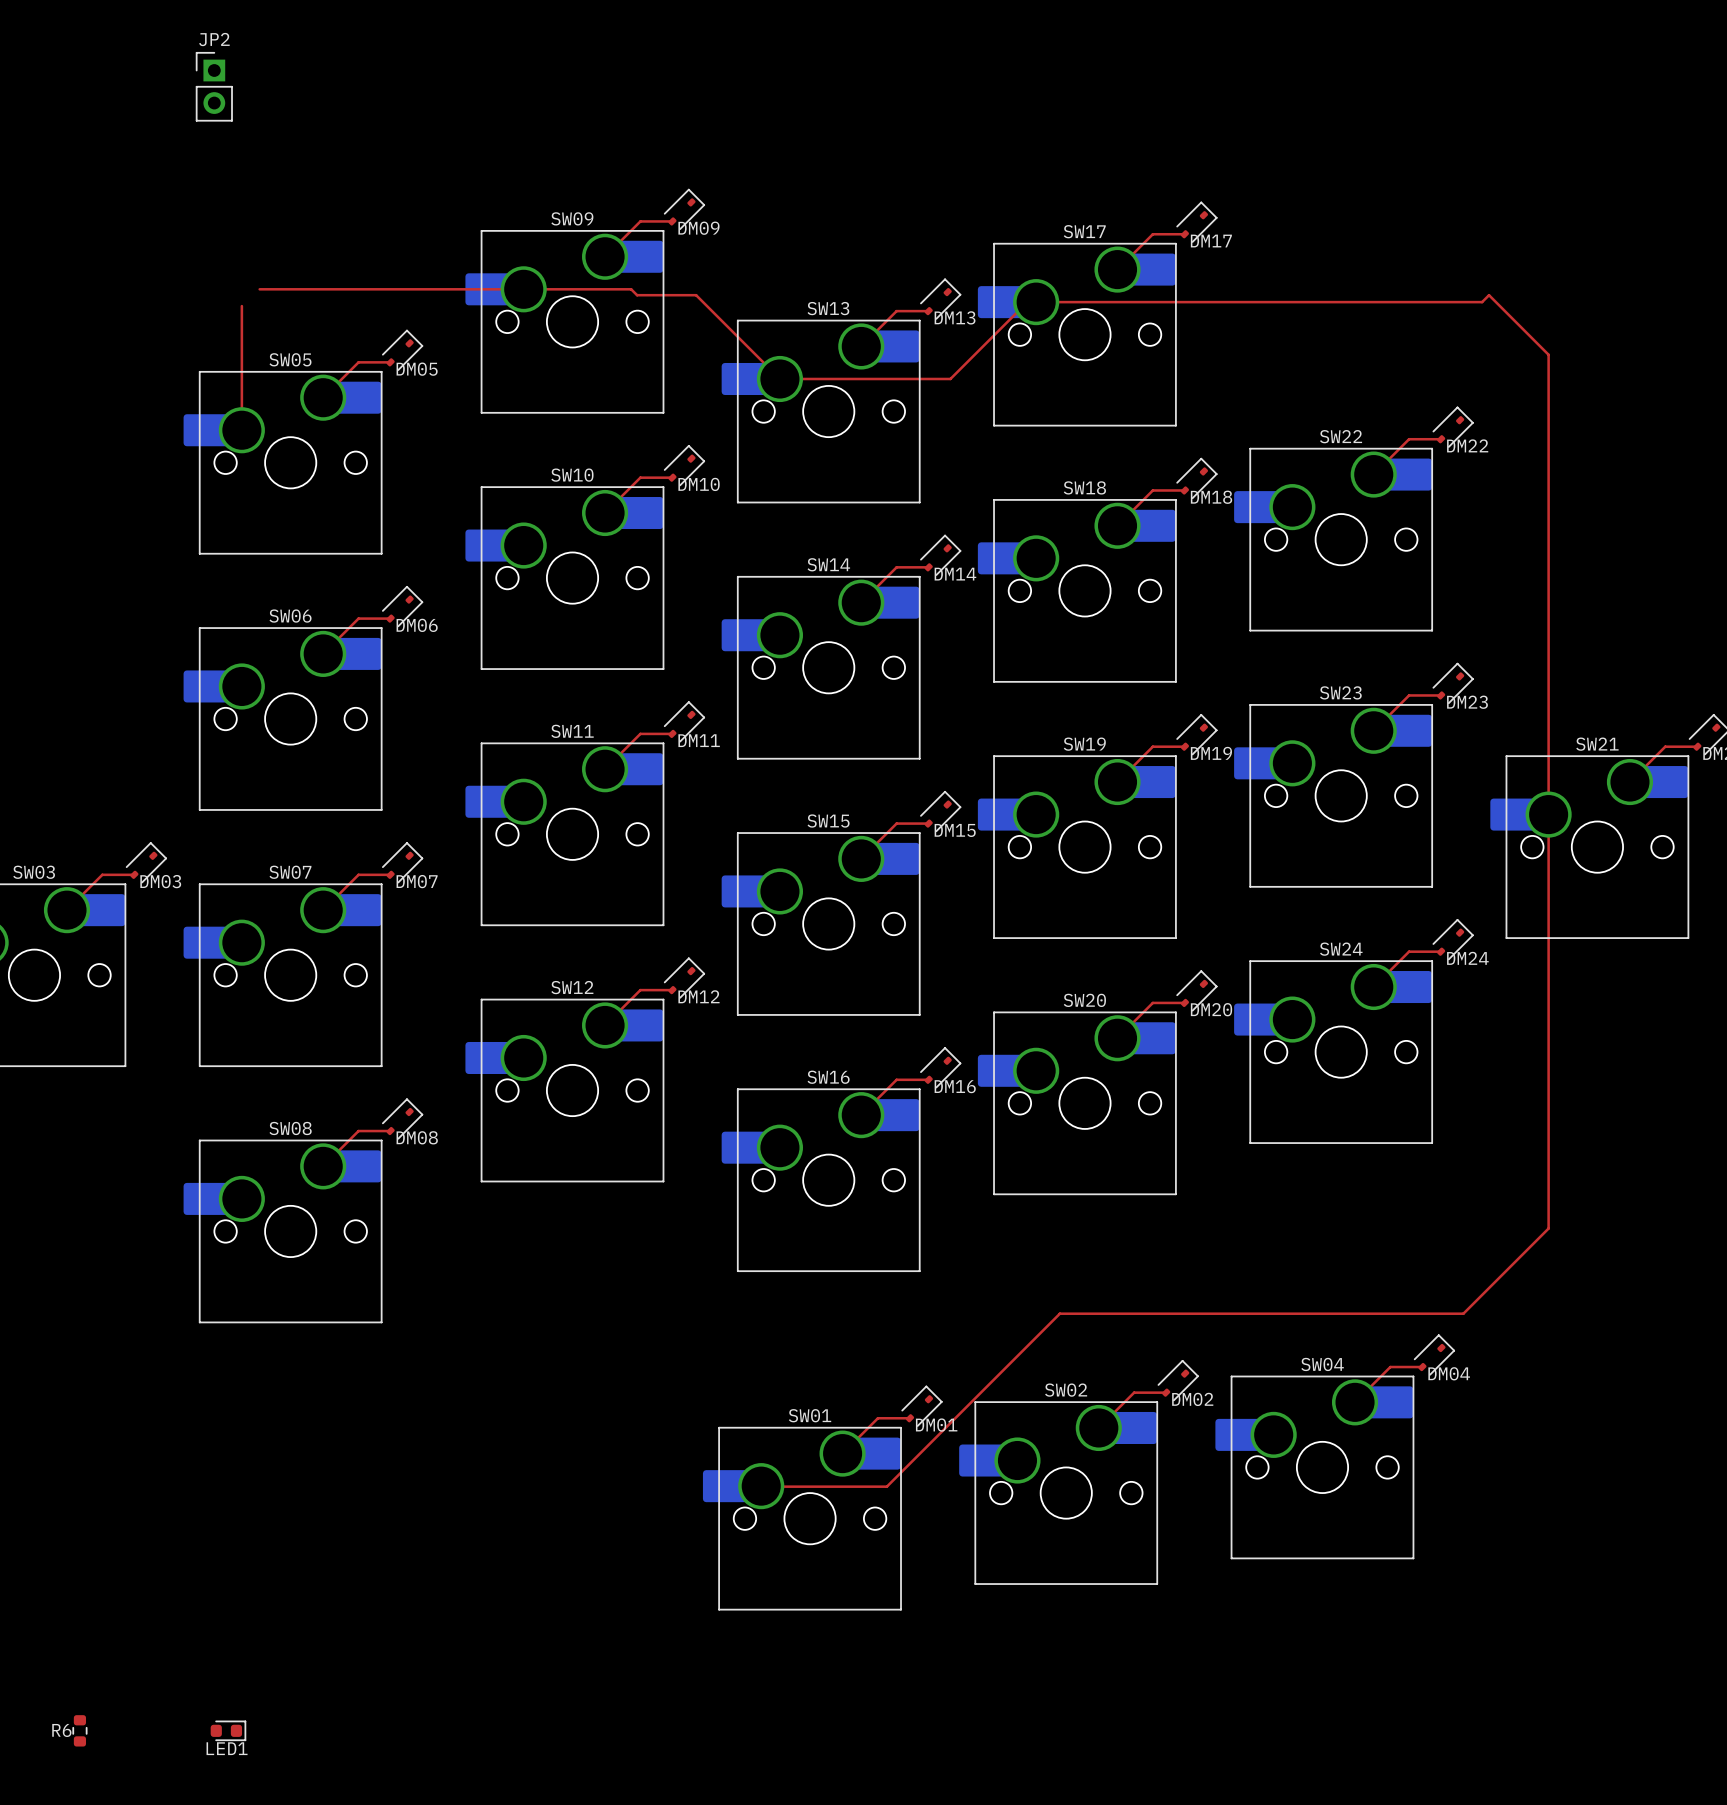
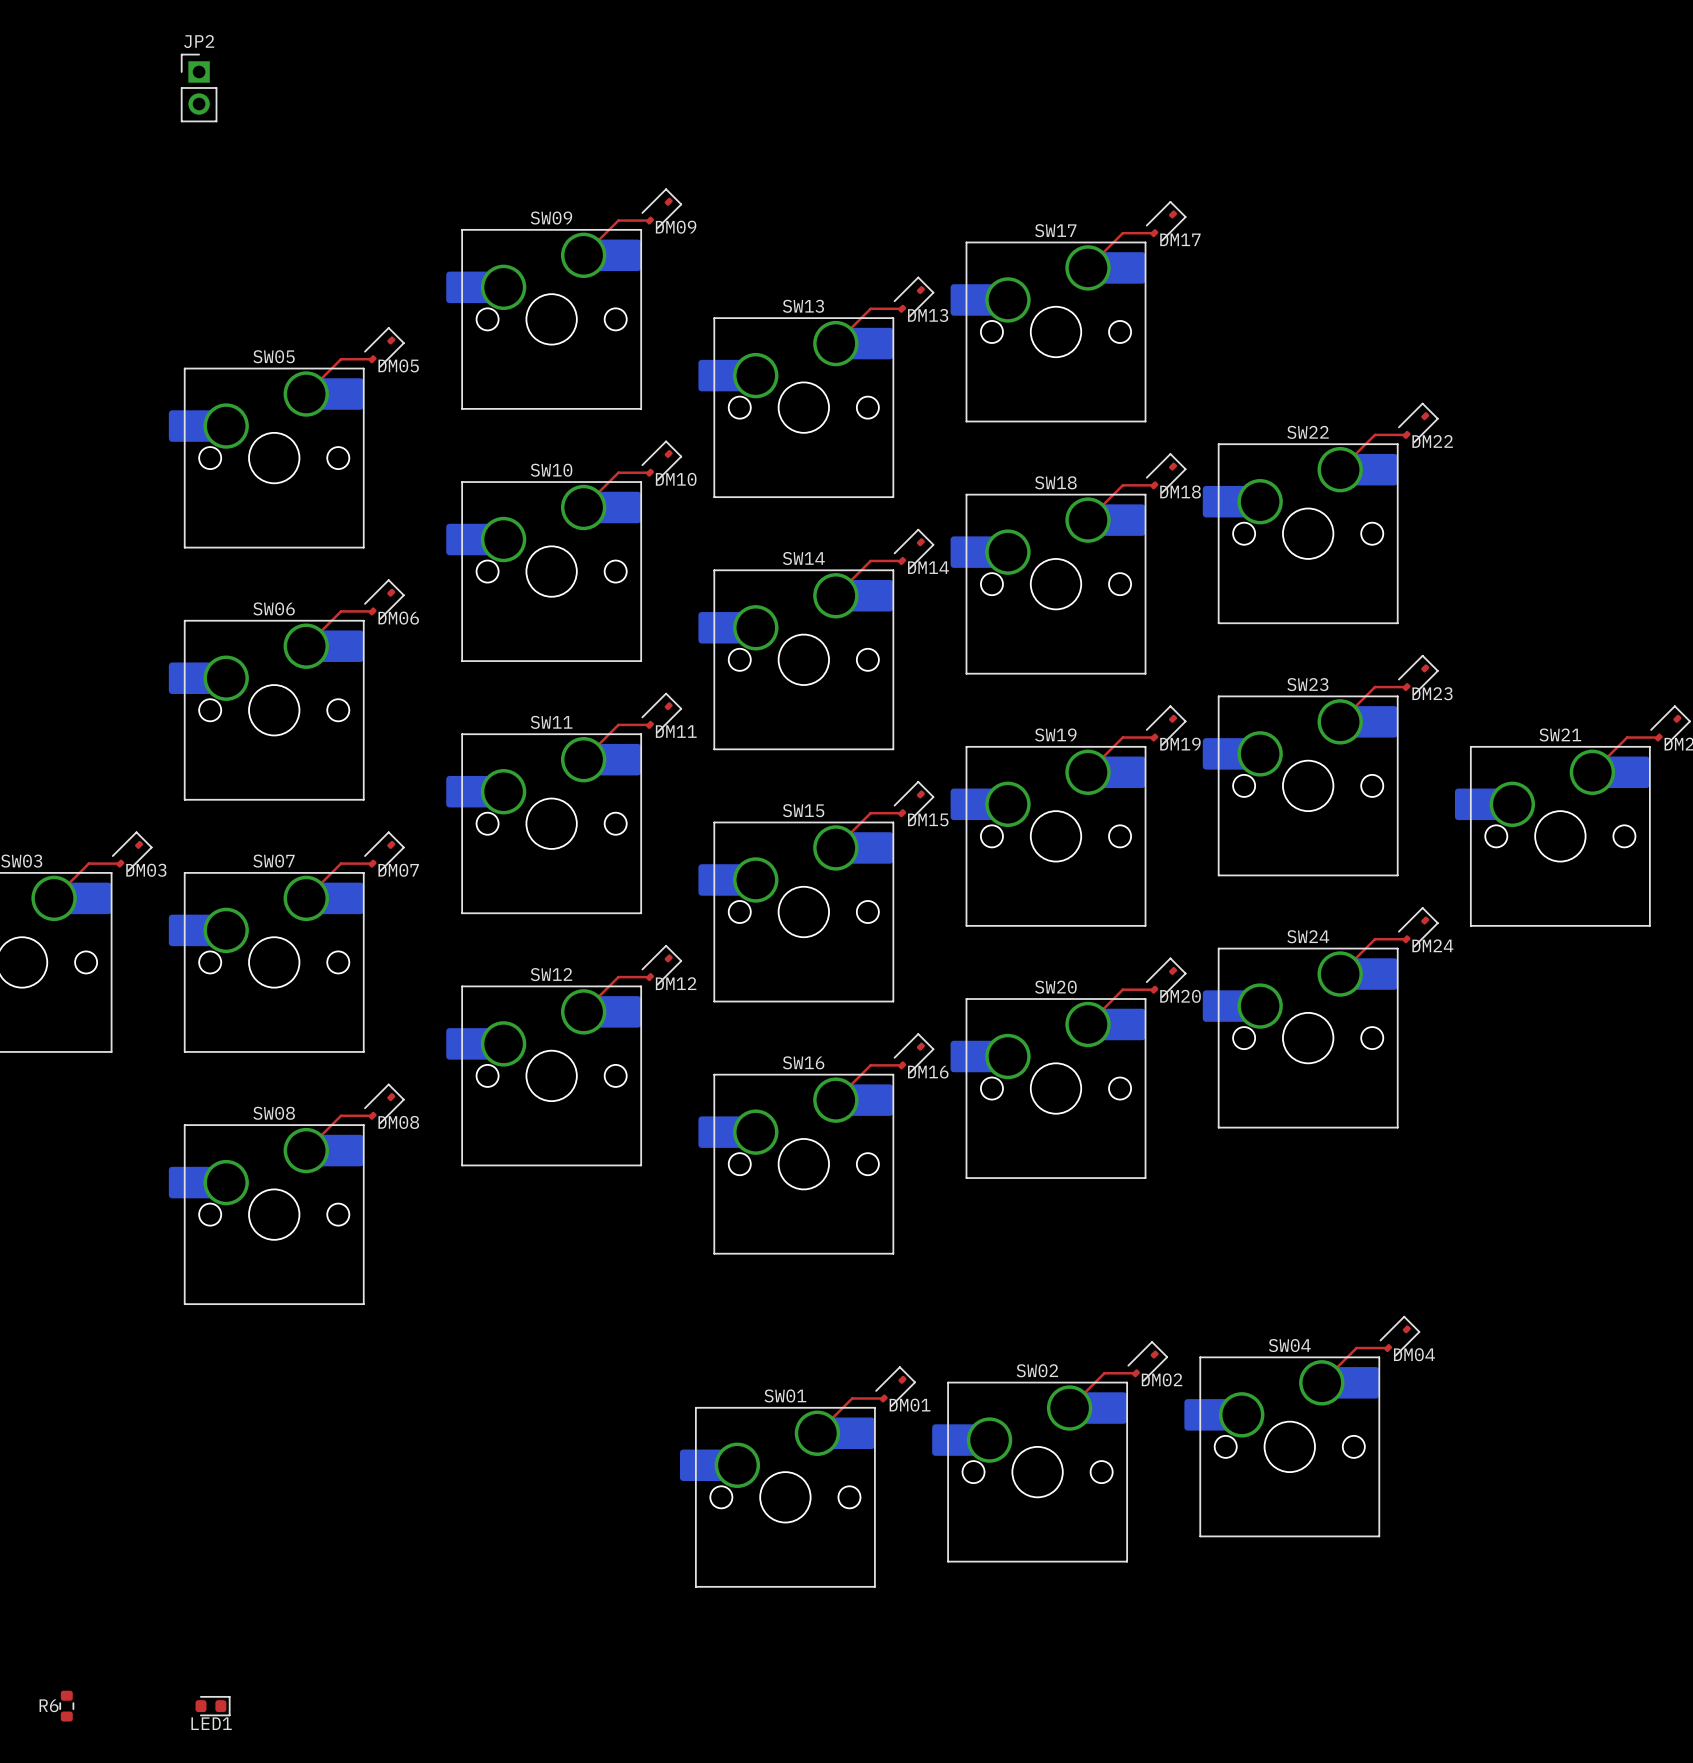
top track: (259, 289) (631, 289) (637, 295) (696, 295) (779, 378) (950, 378) (1027, 302) (1482, 302) (1489, 295) (1548, 354) (1548, 1228) (1463, 1313) (1059, 1313) (886, 1486) (758, 1486) (761, 1486) -> none
top track: (241, 306) (241, 430) (233, 436) (239, 436) -> none

